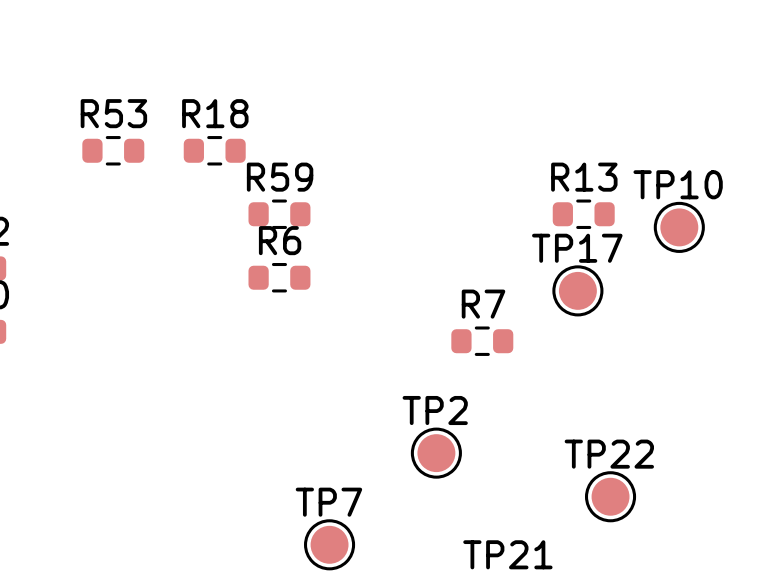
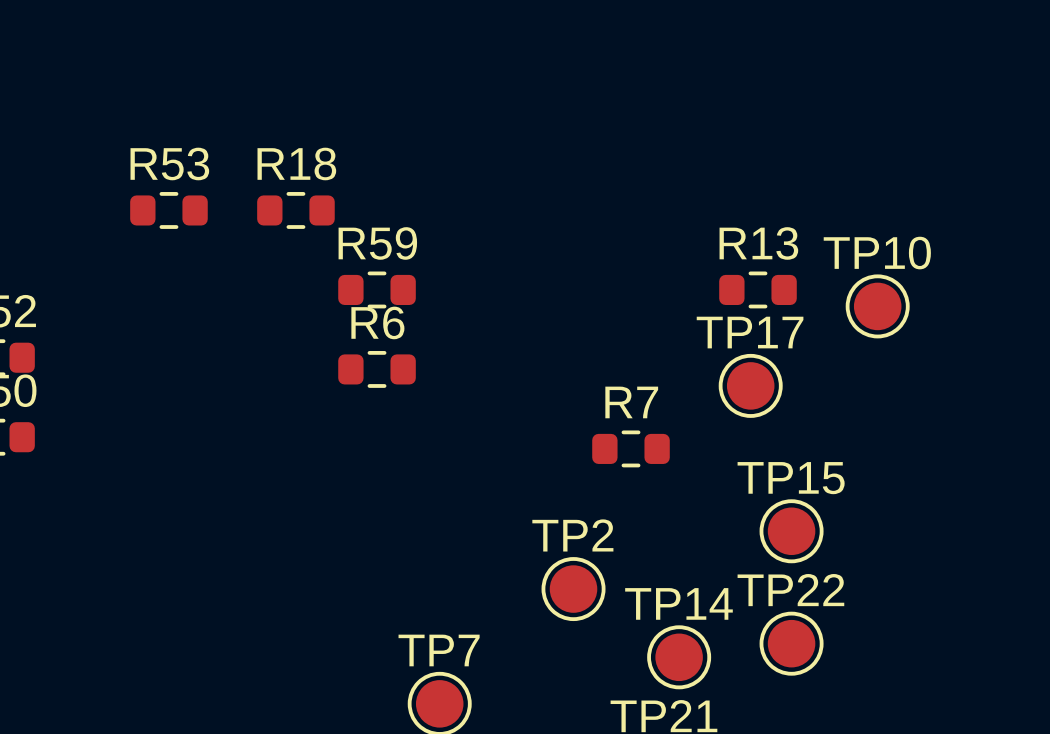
TP15: none -> (791, 531)
TP14: none -> (679, 657)

